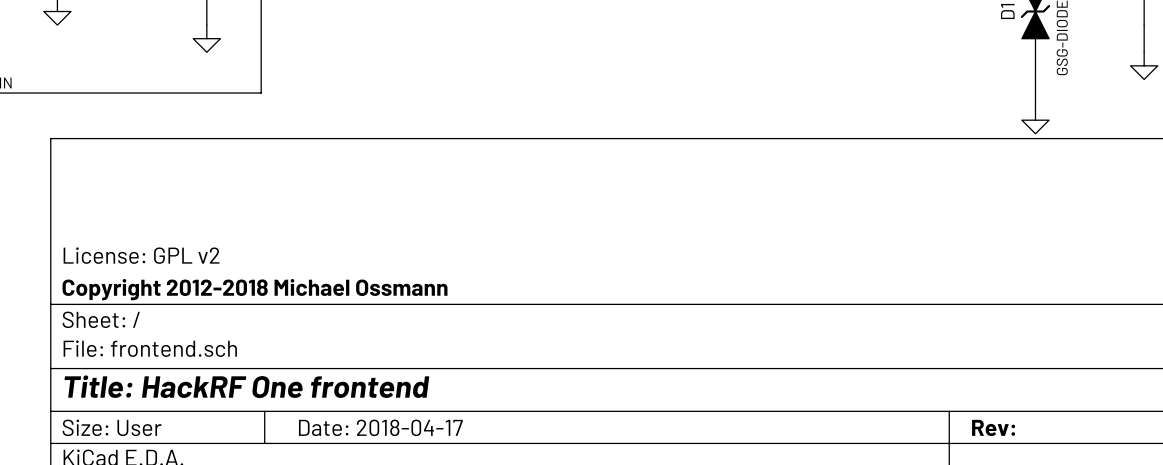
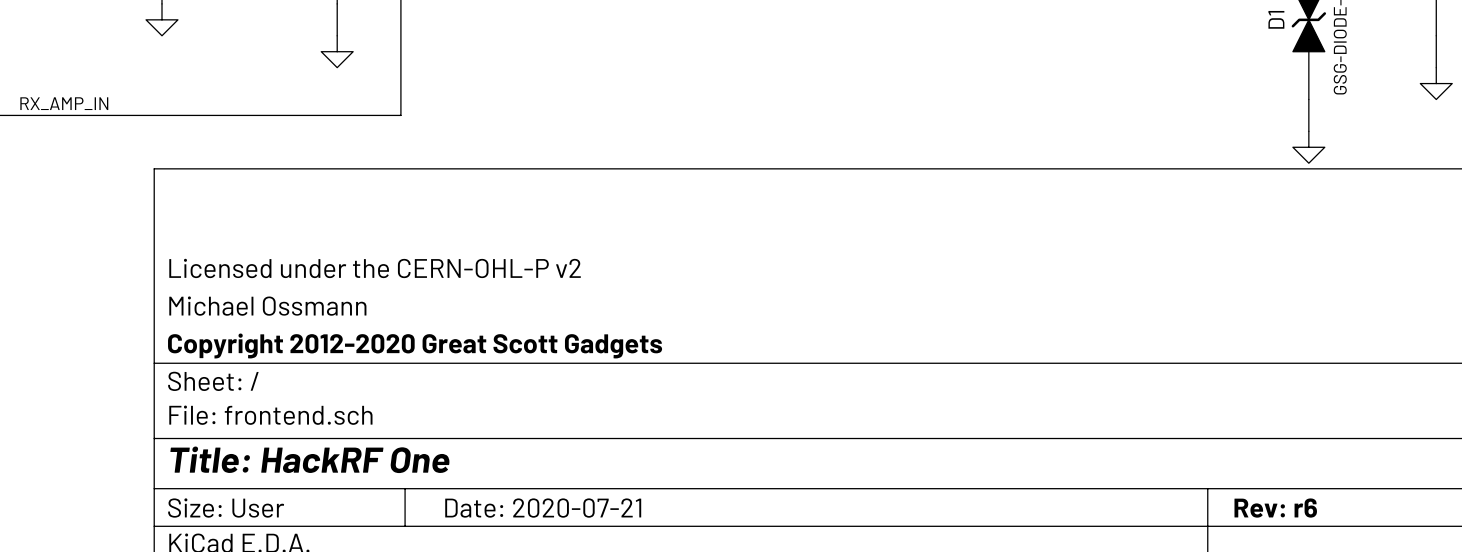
title block: none -> Licensed under the CERN-OHL-P v2 (375, 268)
title block: License: GPL v2 (141, 255) -> Michael Ossmann (267, 306)
title block: Copyright 2012-2018 Michael Ossmann (255, 289) -> Copyright 2012-2020 Great Scott Gadgets (415, 346)
title block: Title: HackRF One frontend (246, 386) -> Title: HackRF One (309, 459)
title block: Date: 2018-04-17 (380, 427) -> Date: 2020-07-21 (543, 508)
title block: Rev: (993, 427) -> Rev: r6 (1275, 508)

